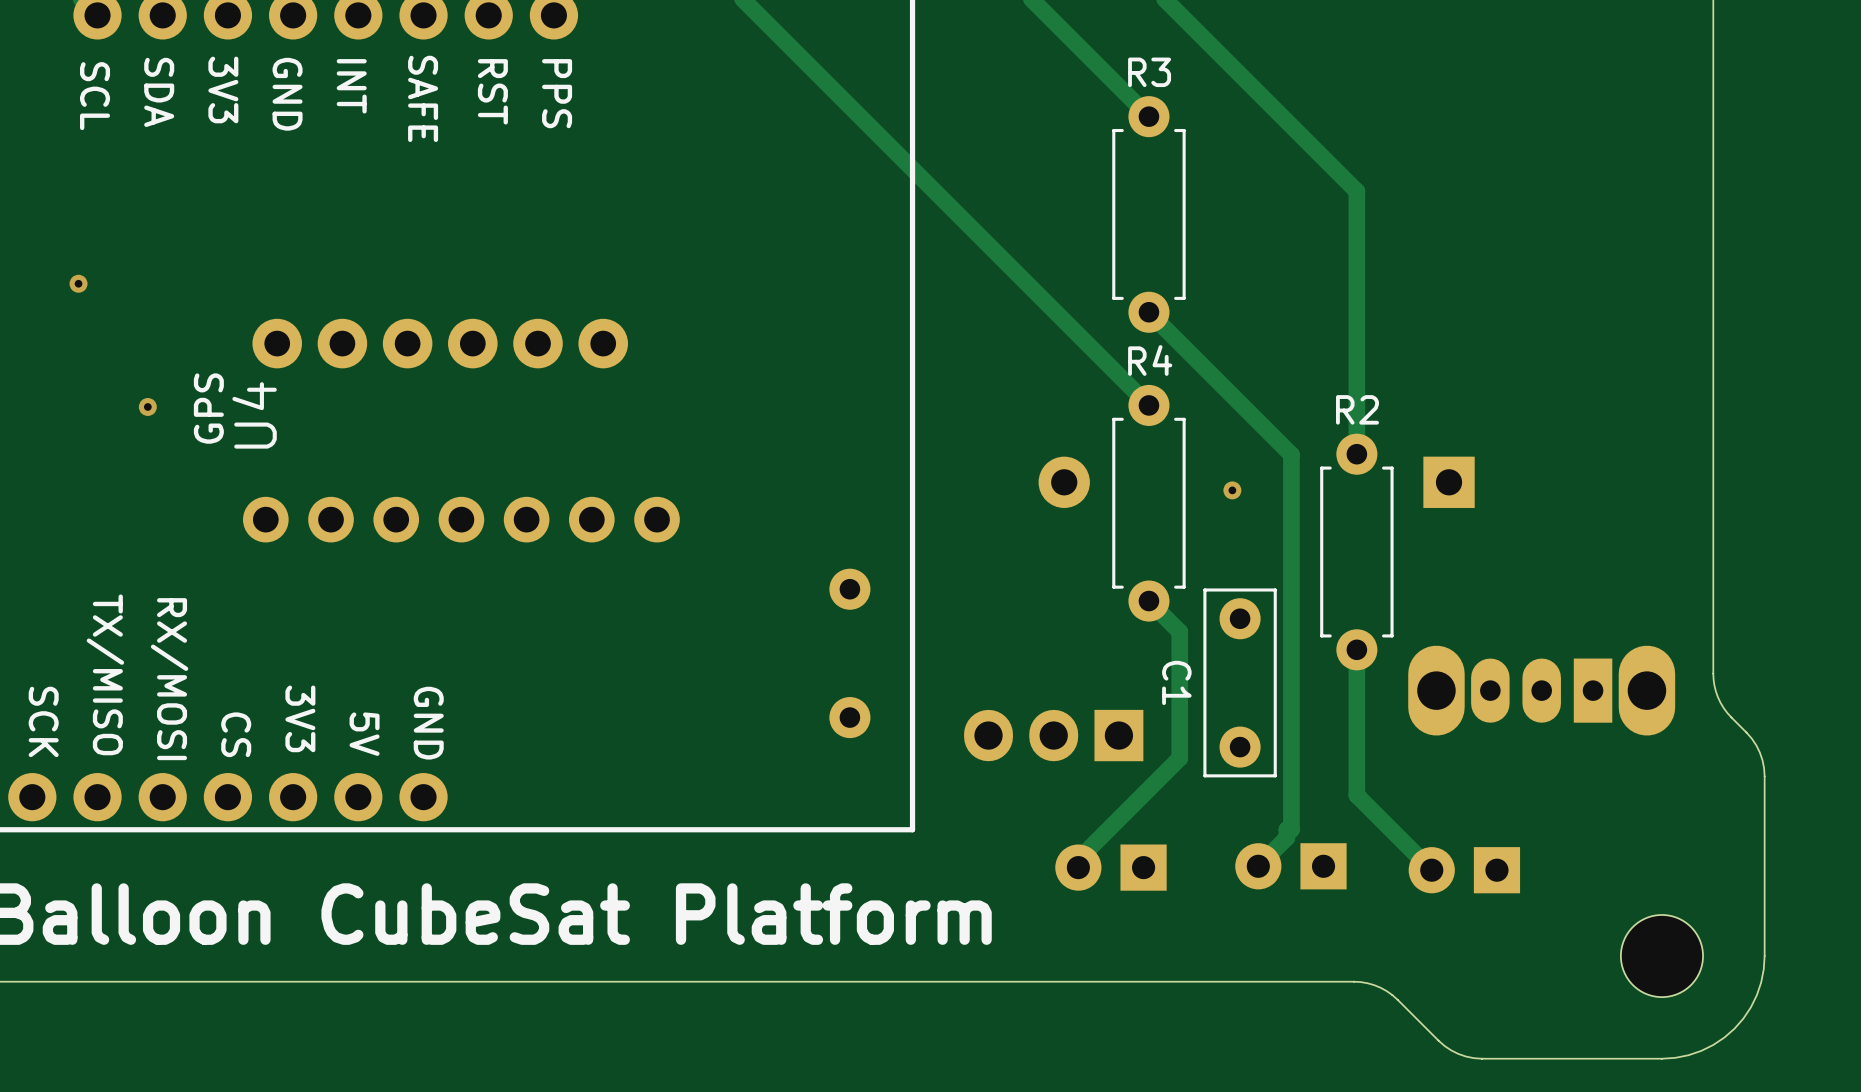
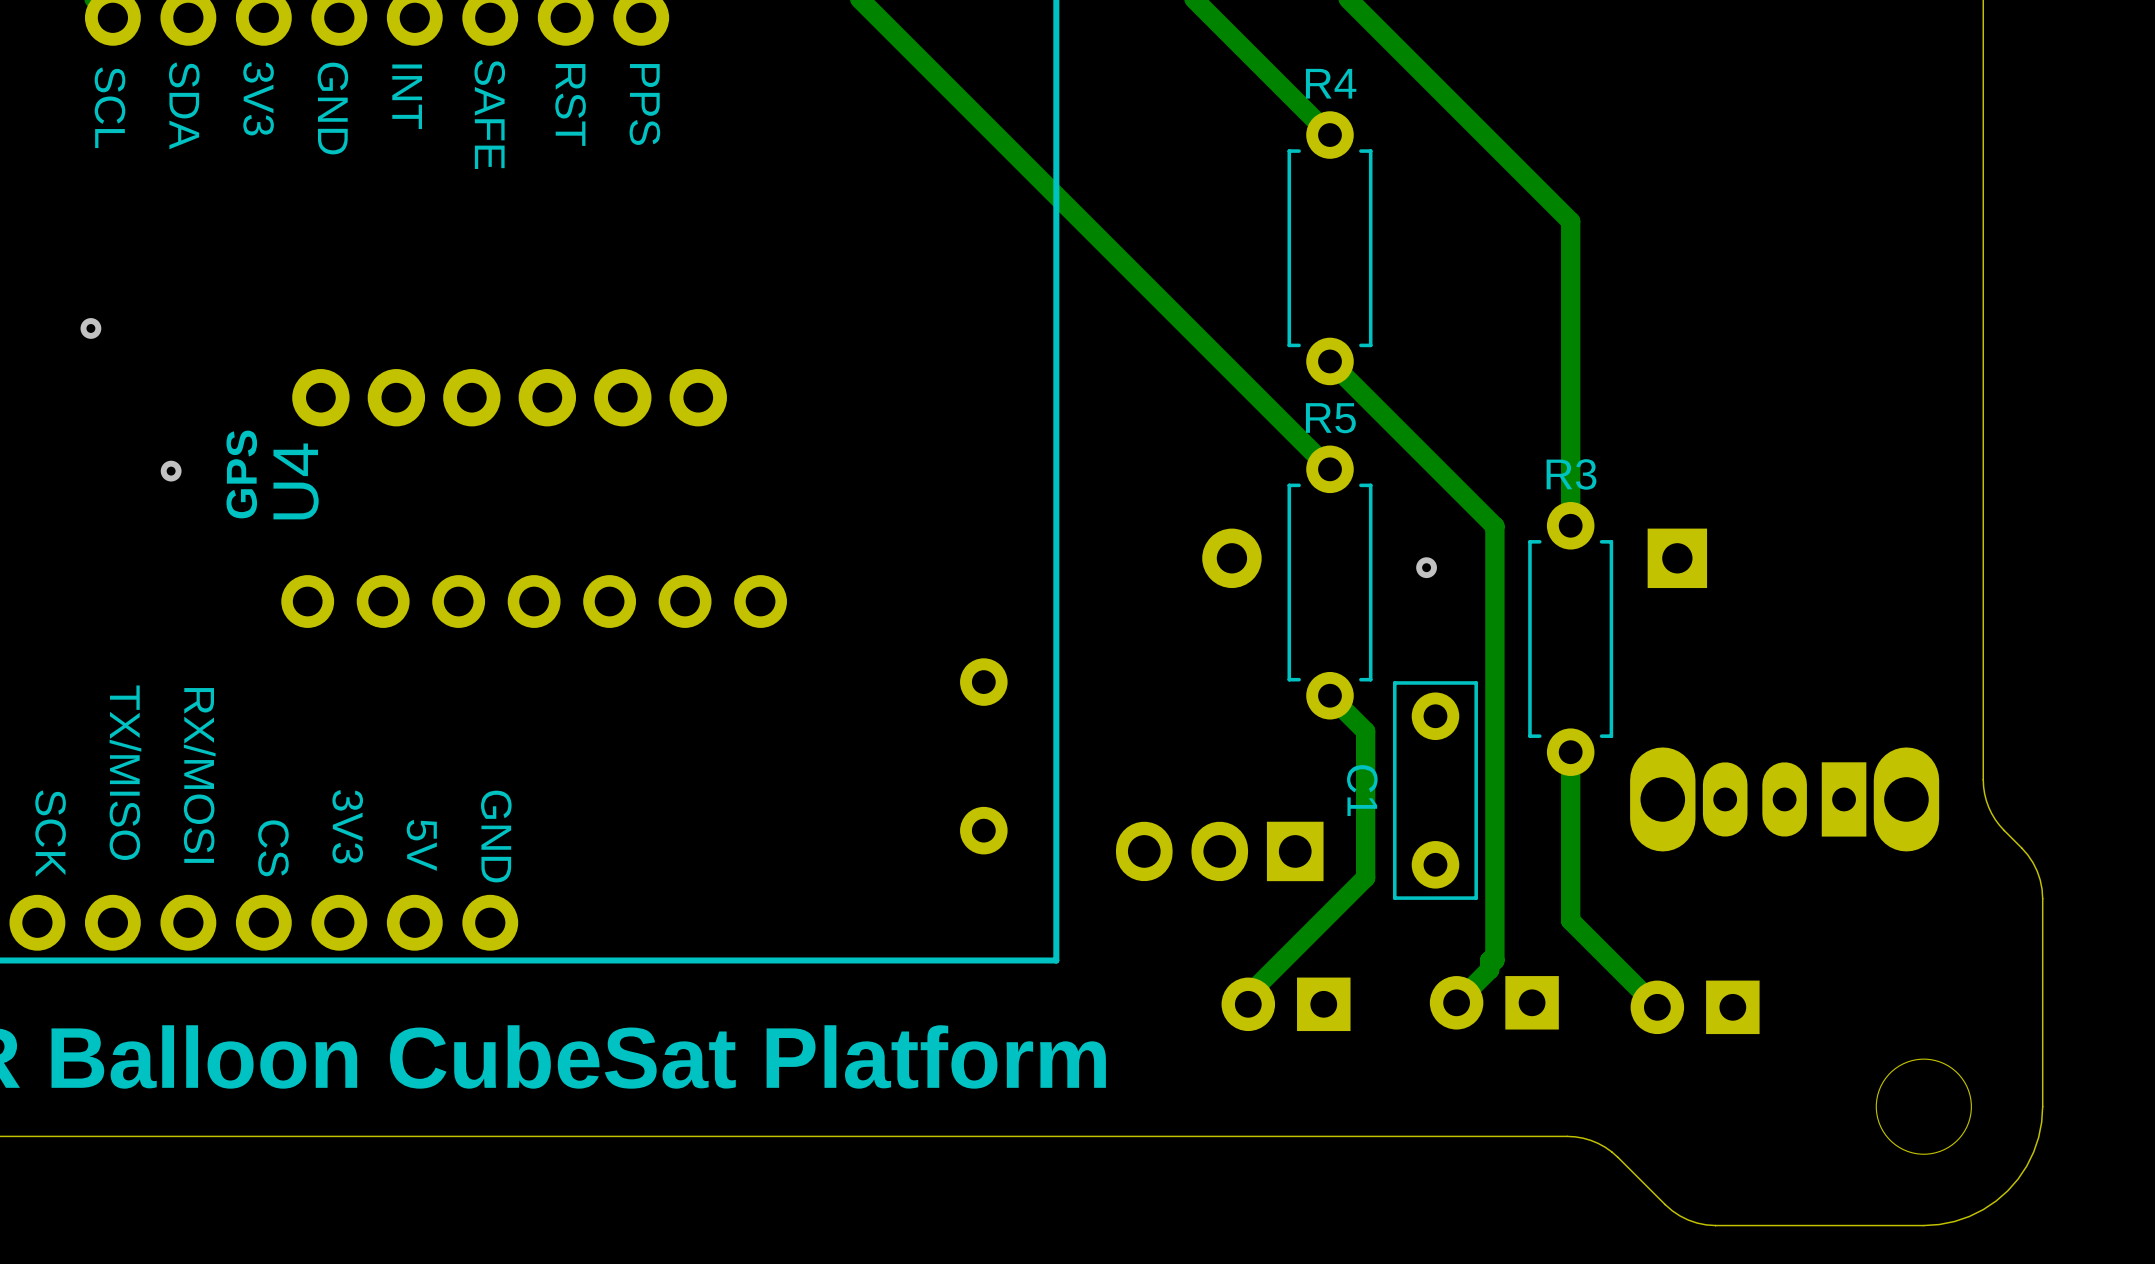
R3 name: R3 (1149, 72) -> R4 (1331, 83)
R4 name: R4 (1150, 360) -> R5 (1330, 418)
R2 name: R2 (1357, 409) -> R3 (1571, 474)

